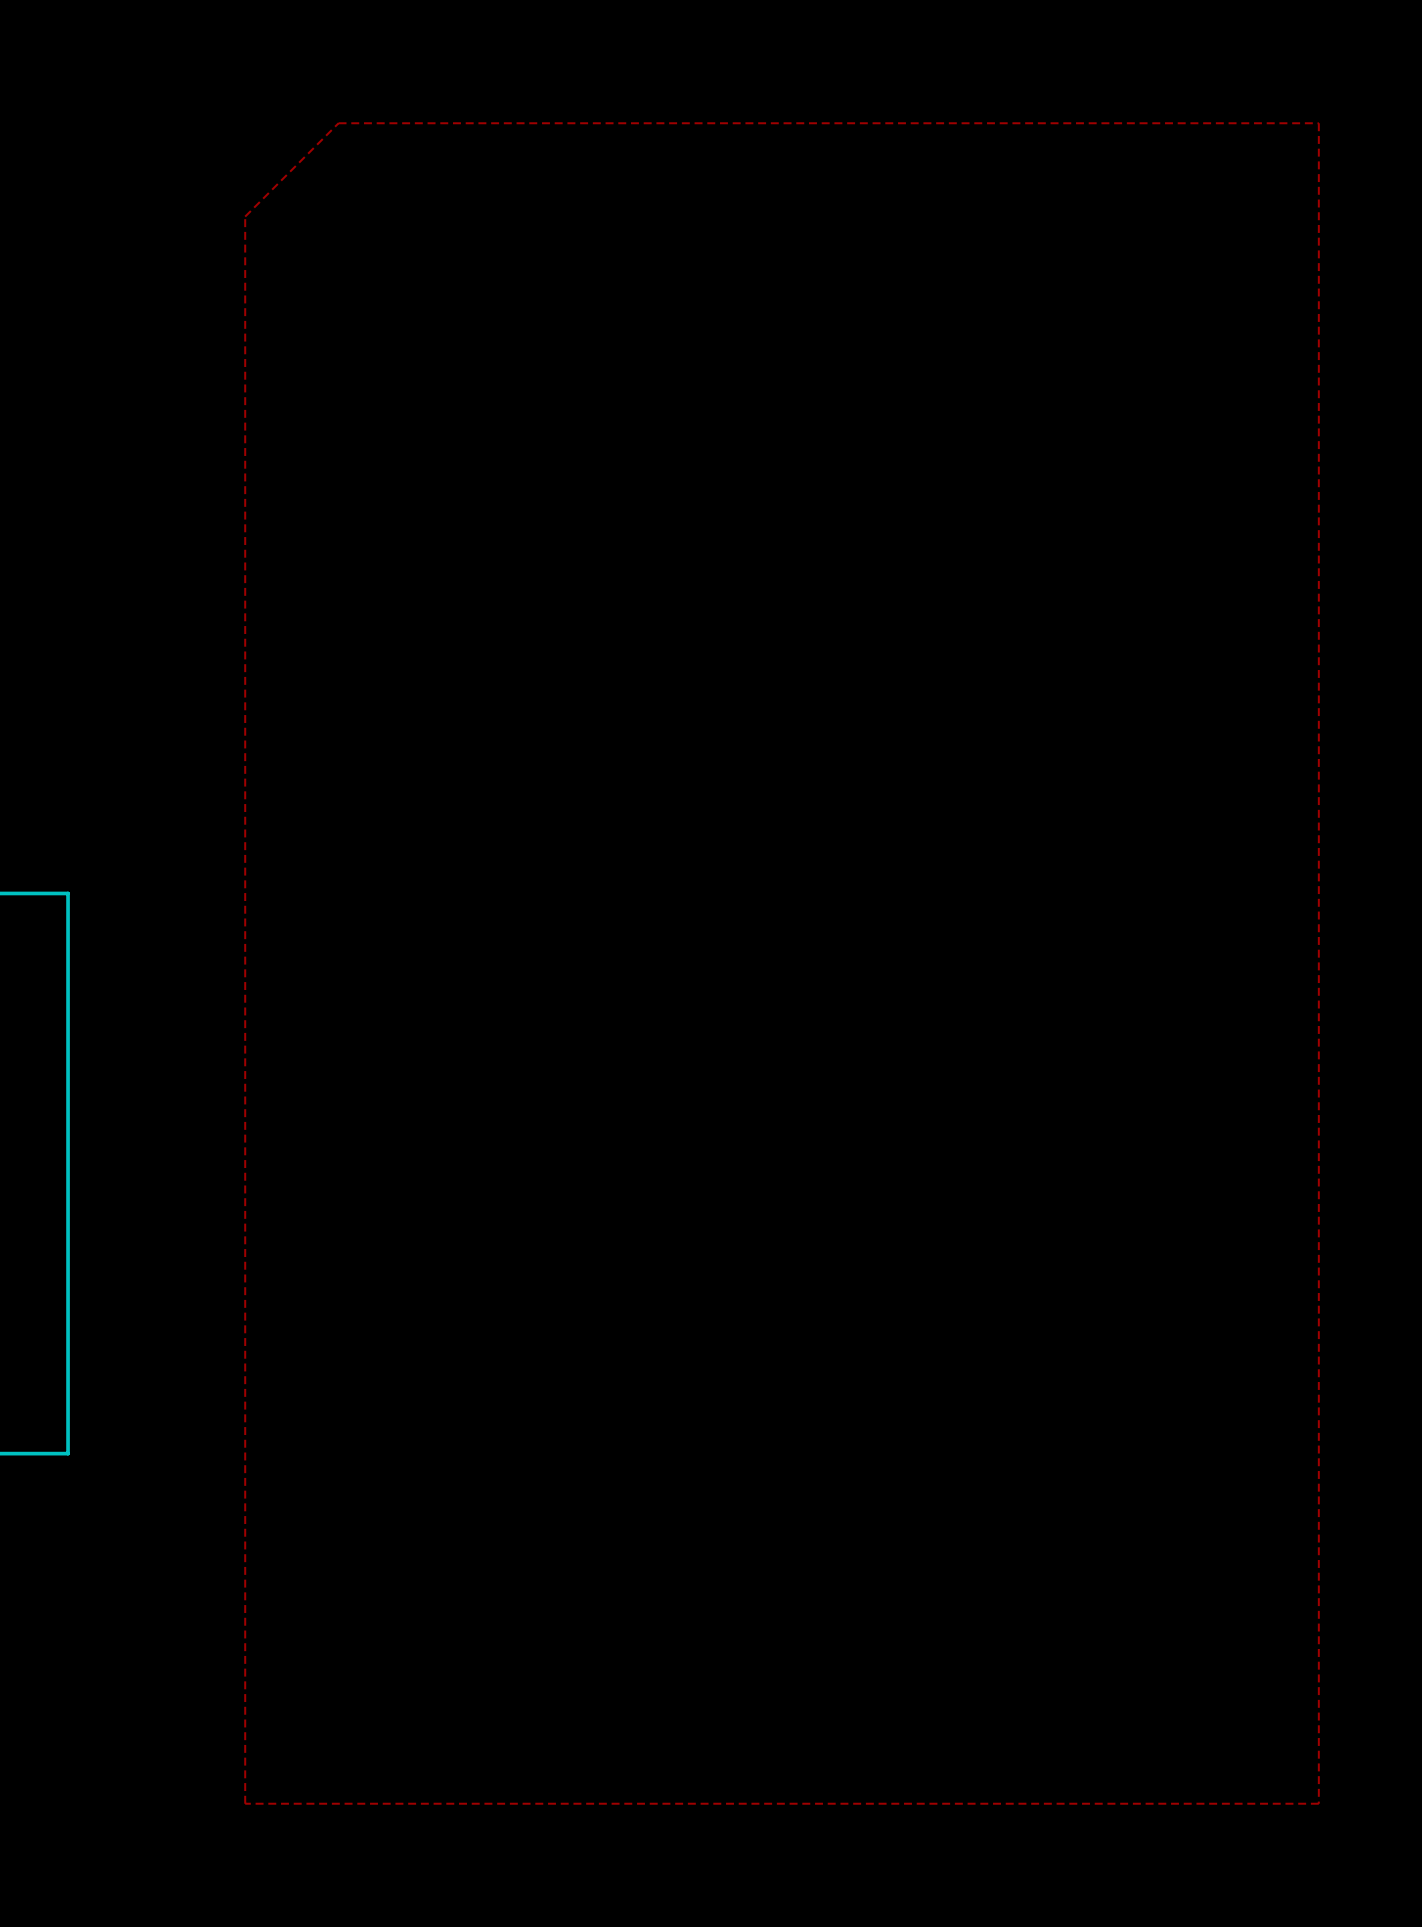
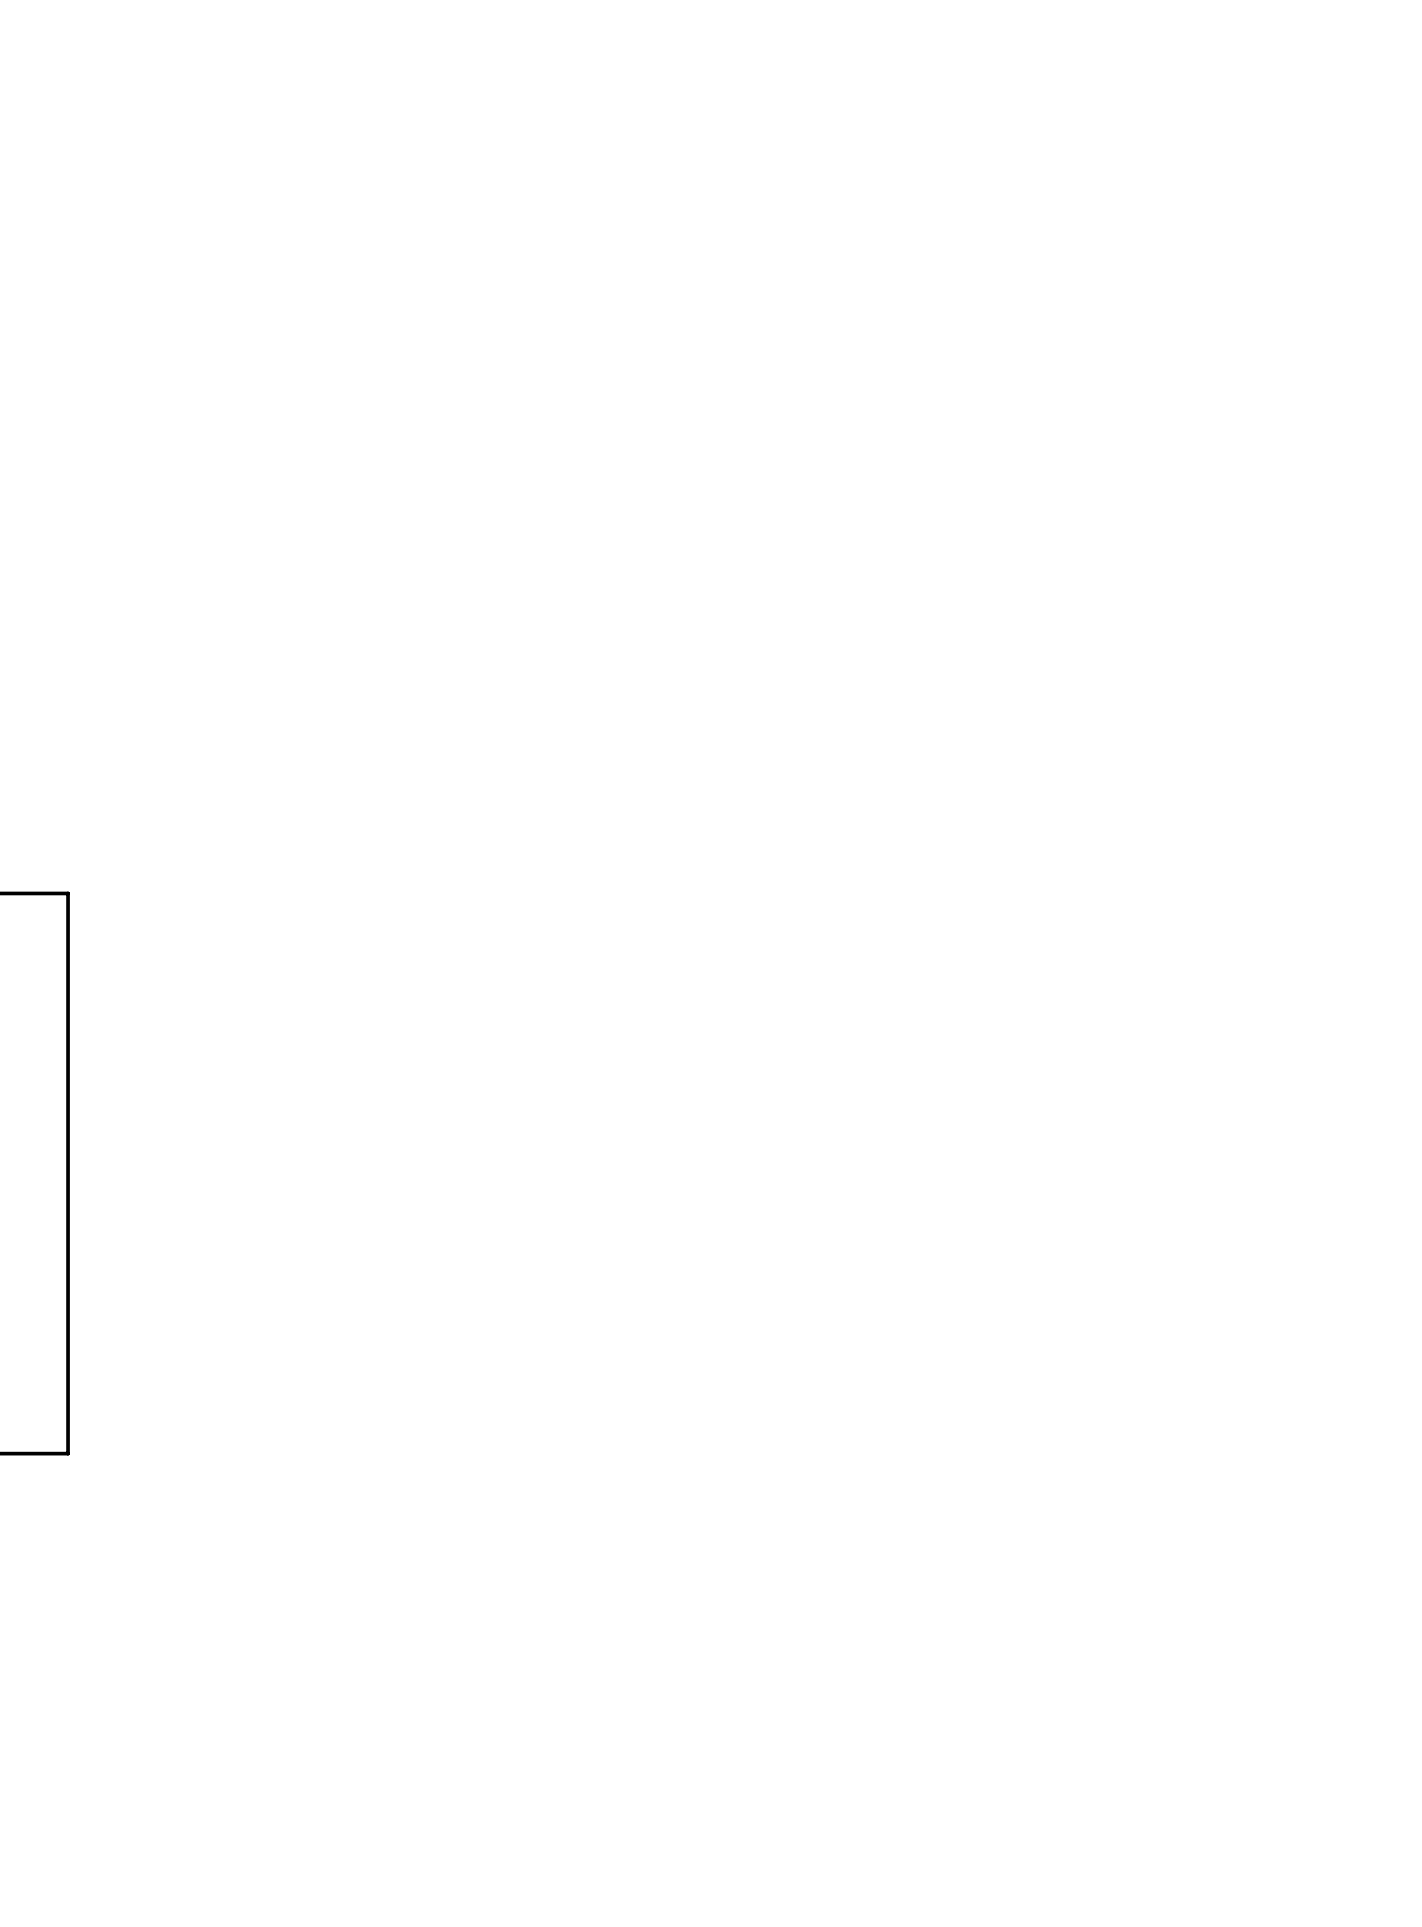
zone outline: (338, 123) (245, 216) (245, 1803) (1318, 1803) (1318, 123) (338, 123) -> none

